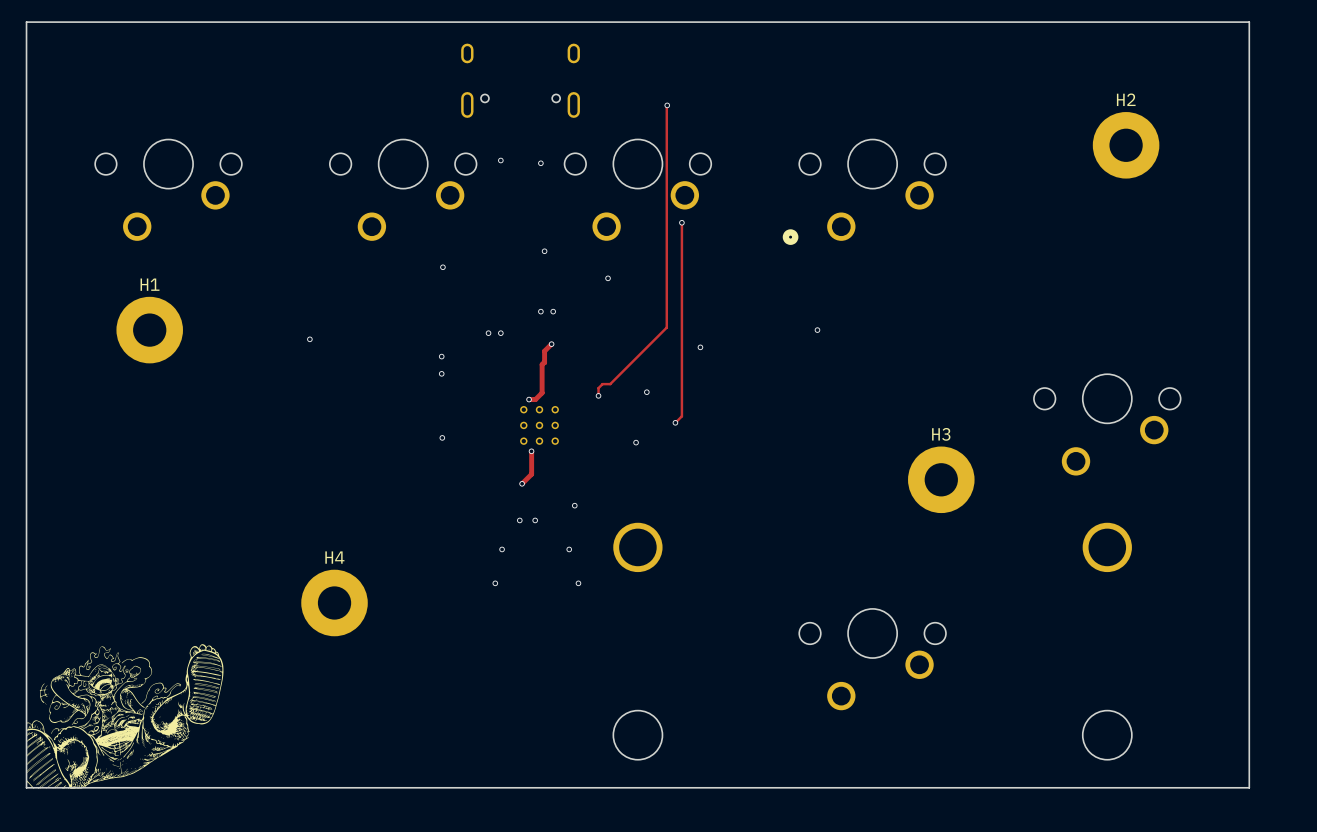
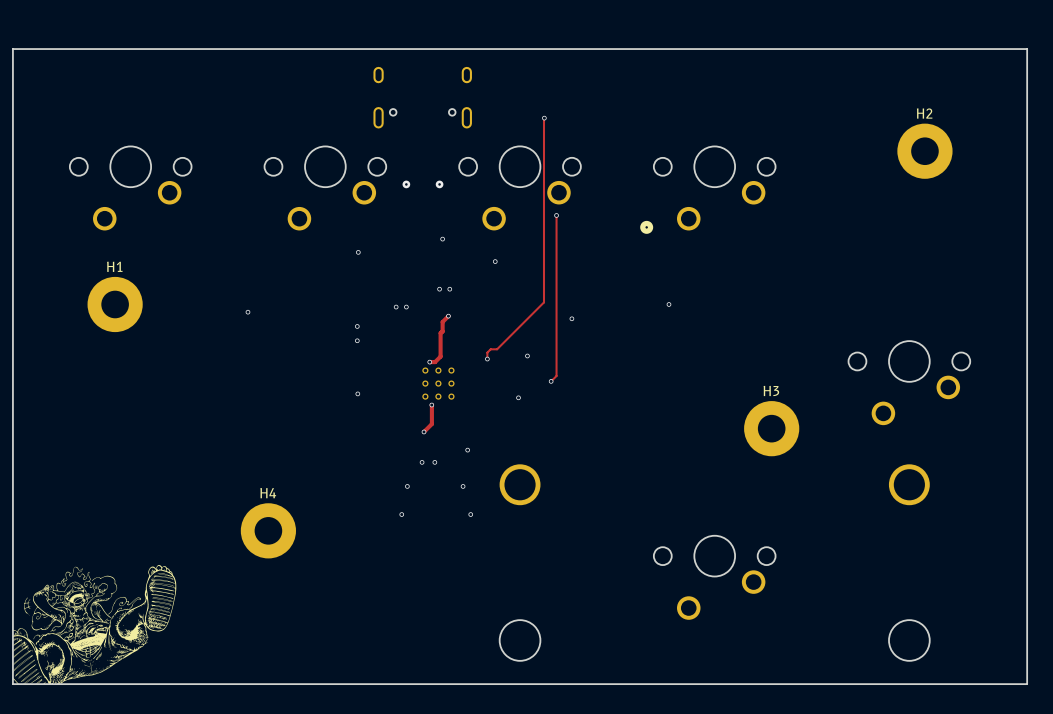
via: (500, 160) -> none
via: (540, 163) -> none
via: none -> (406, 184)
via: none -> (439, 184)

